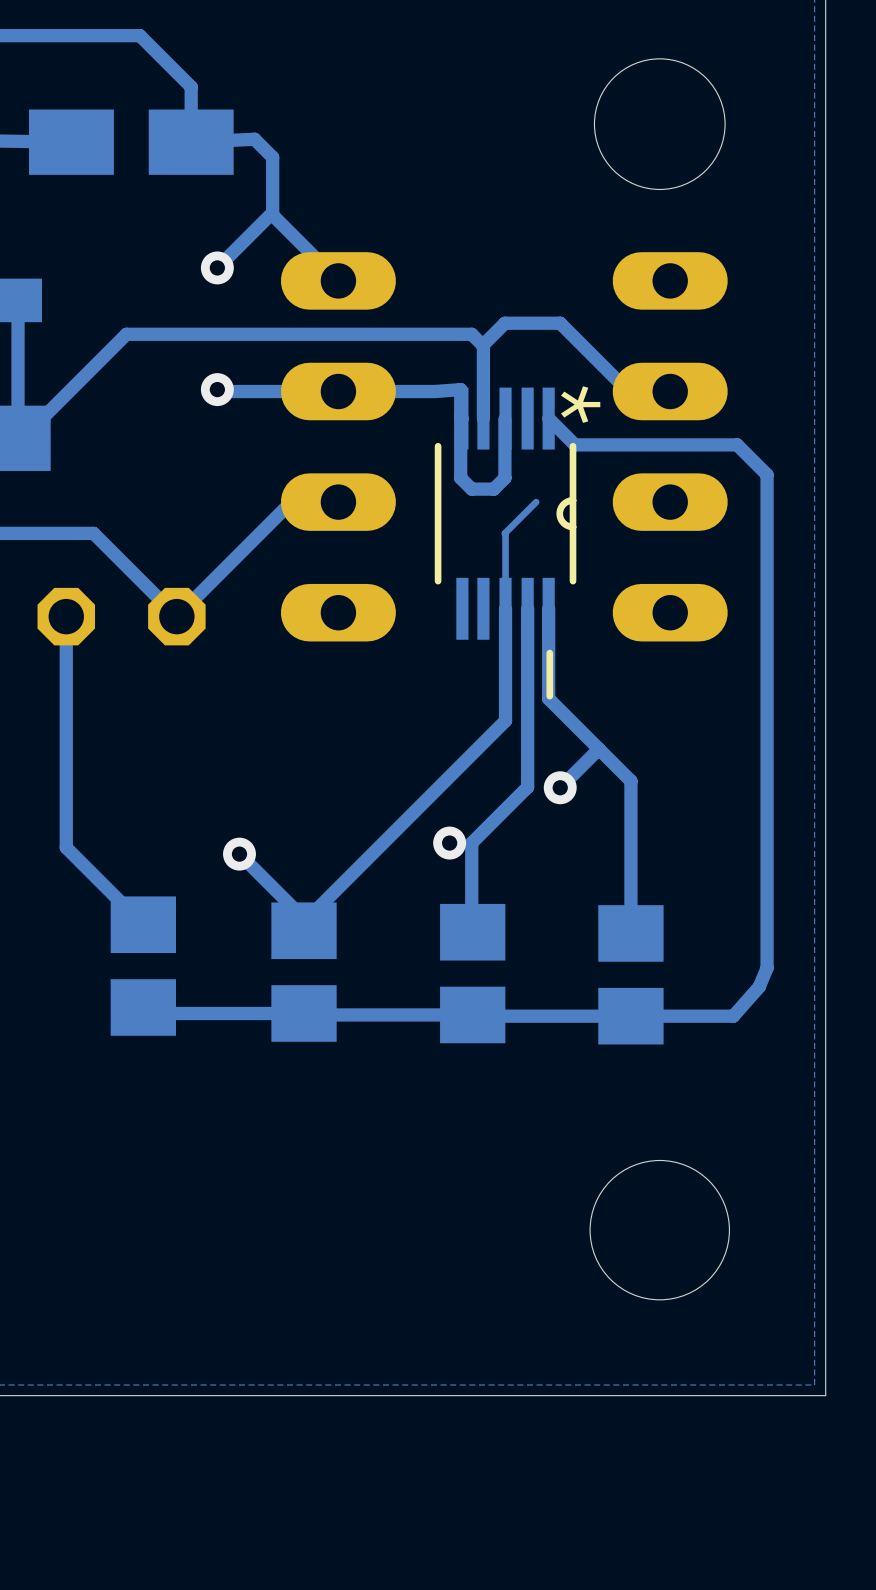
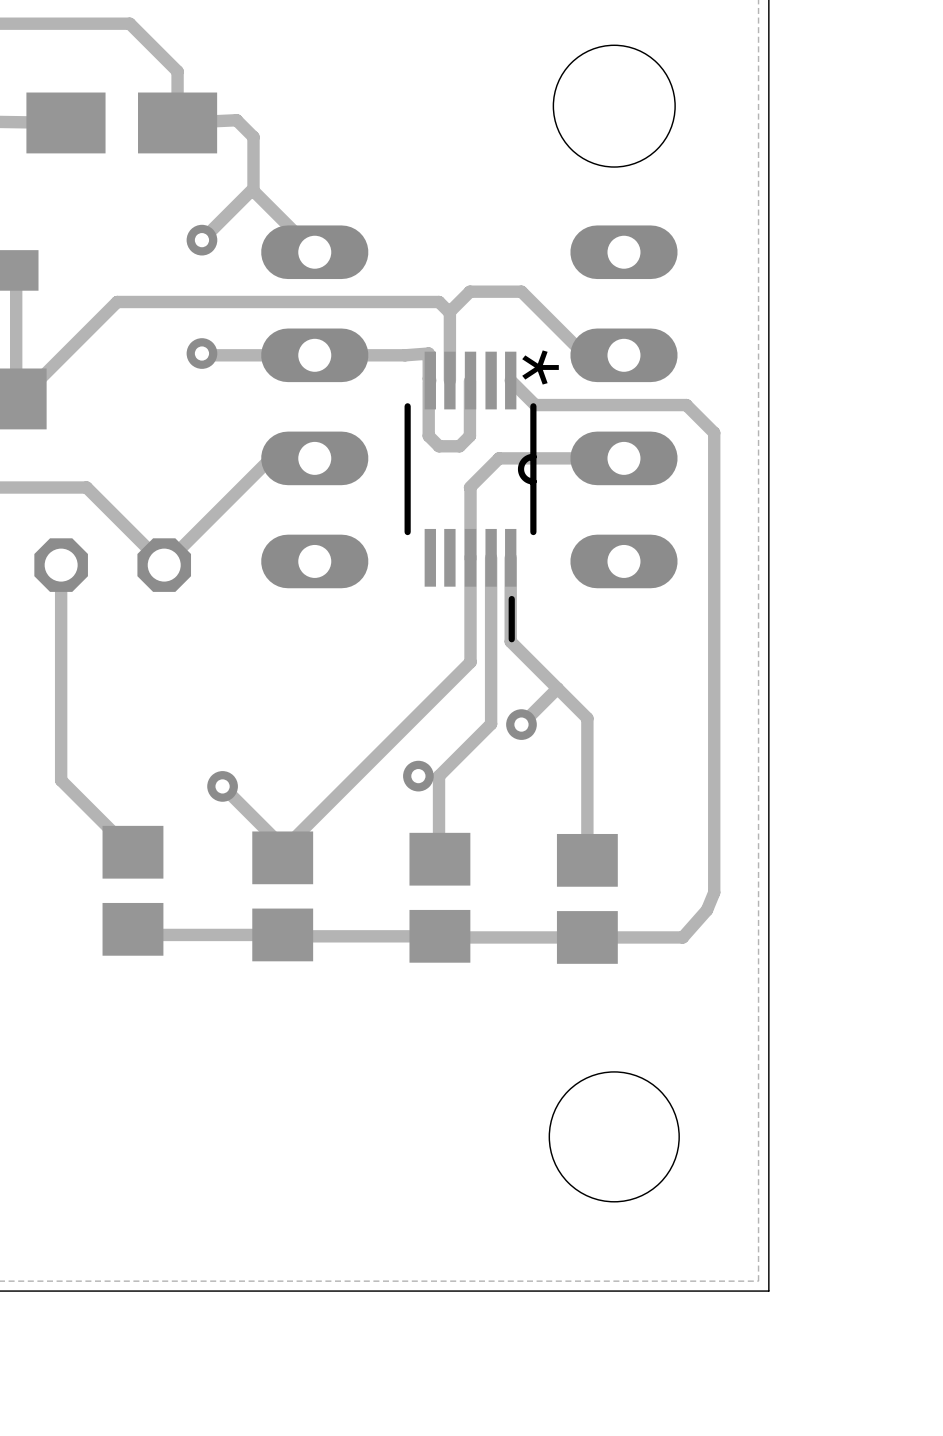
track width: thin (536, 502) (504, 533) -> thick (499, 458) (469, 487)
track: none -> (623, 458) (499, 458)
track width: thin (505, 533) (505, 608) -> thick (470, 488) (470, 557)

